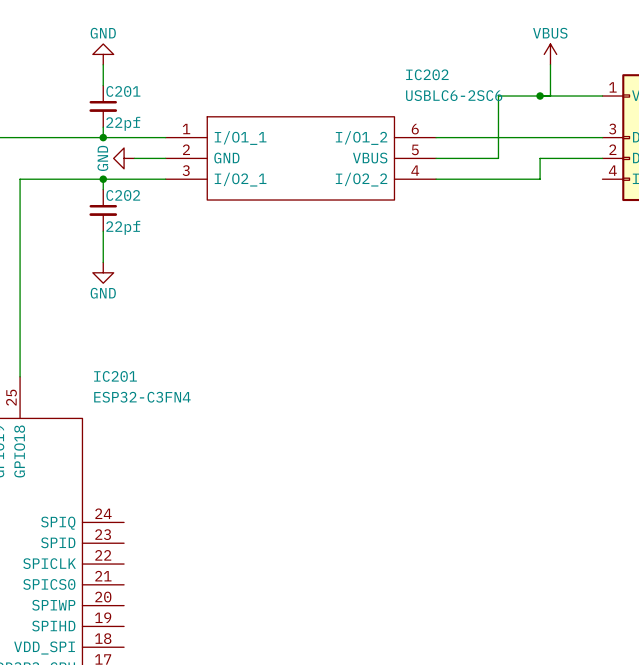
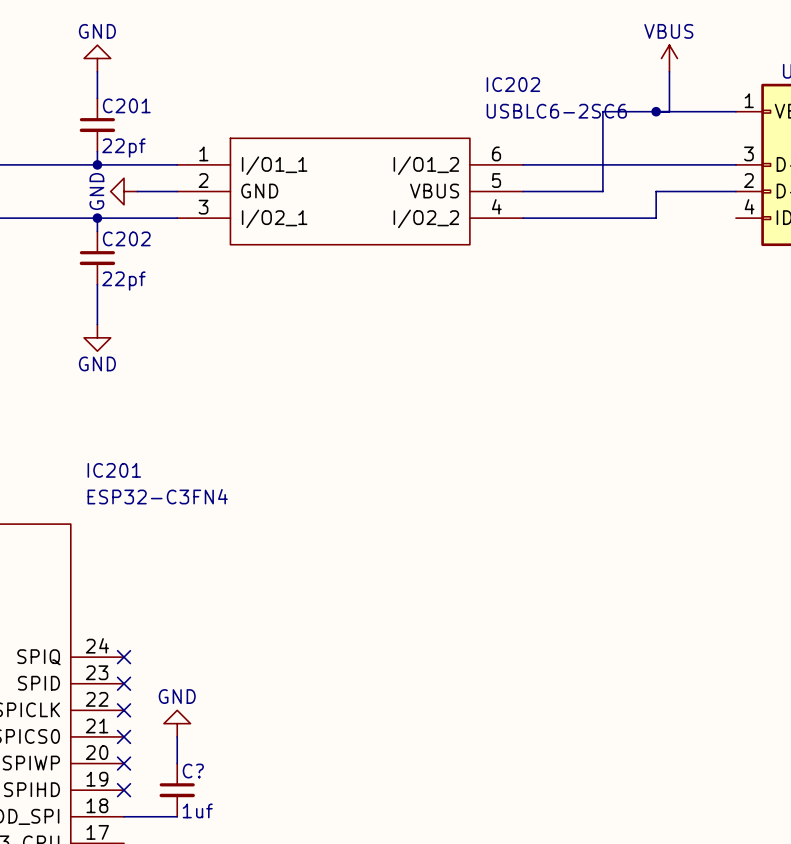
no-connect mark: none -> (124, 657)
no-connect mark: none -> (124, 683)
no-connect mark: none -> (124, 710)
power symbol: none -> GND (177, 723)
no-connect mark: none -> (124, 736)
wire: none -> (177, 736) (177, 763)
no-connect mark: none -> (124, 763)
no-connect mark: none -> (124, 790)
C?: none -> 1uf (177, 790)
wire: none -> (124, 816) (177, 816)

